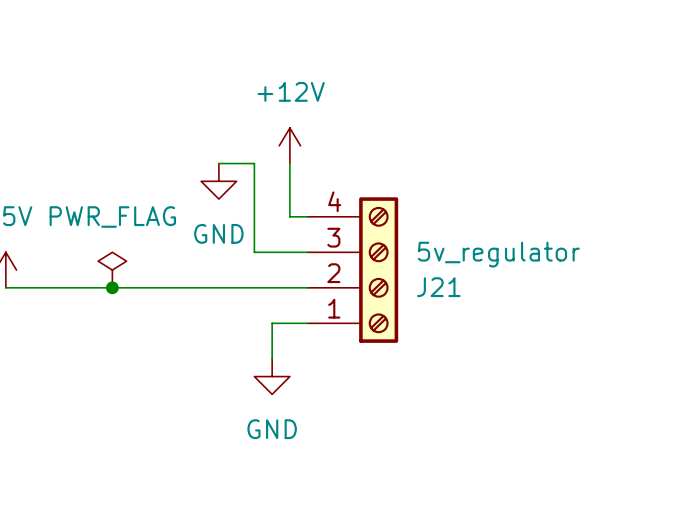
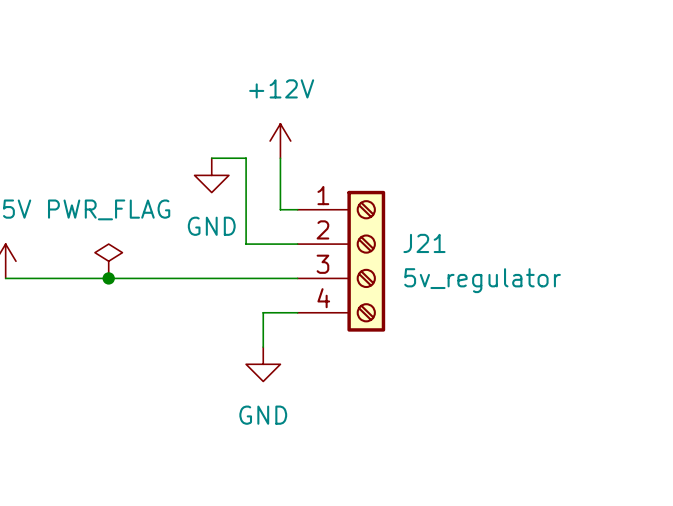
J21 flip: as is (378, 270) -> up-down (366, 261)

